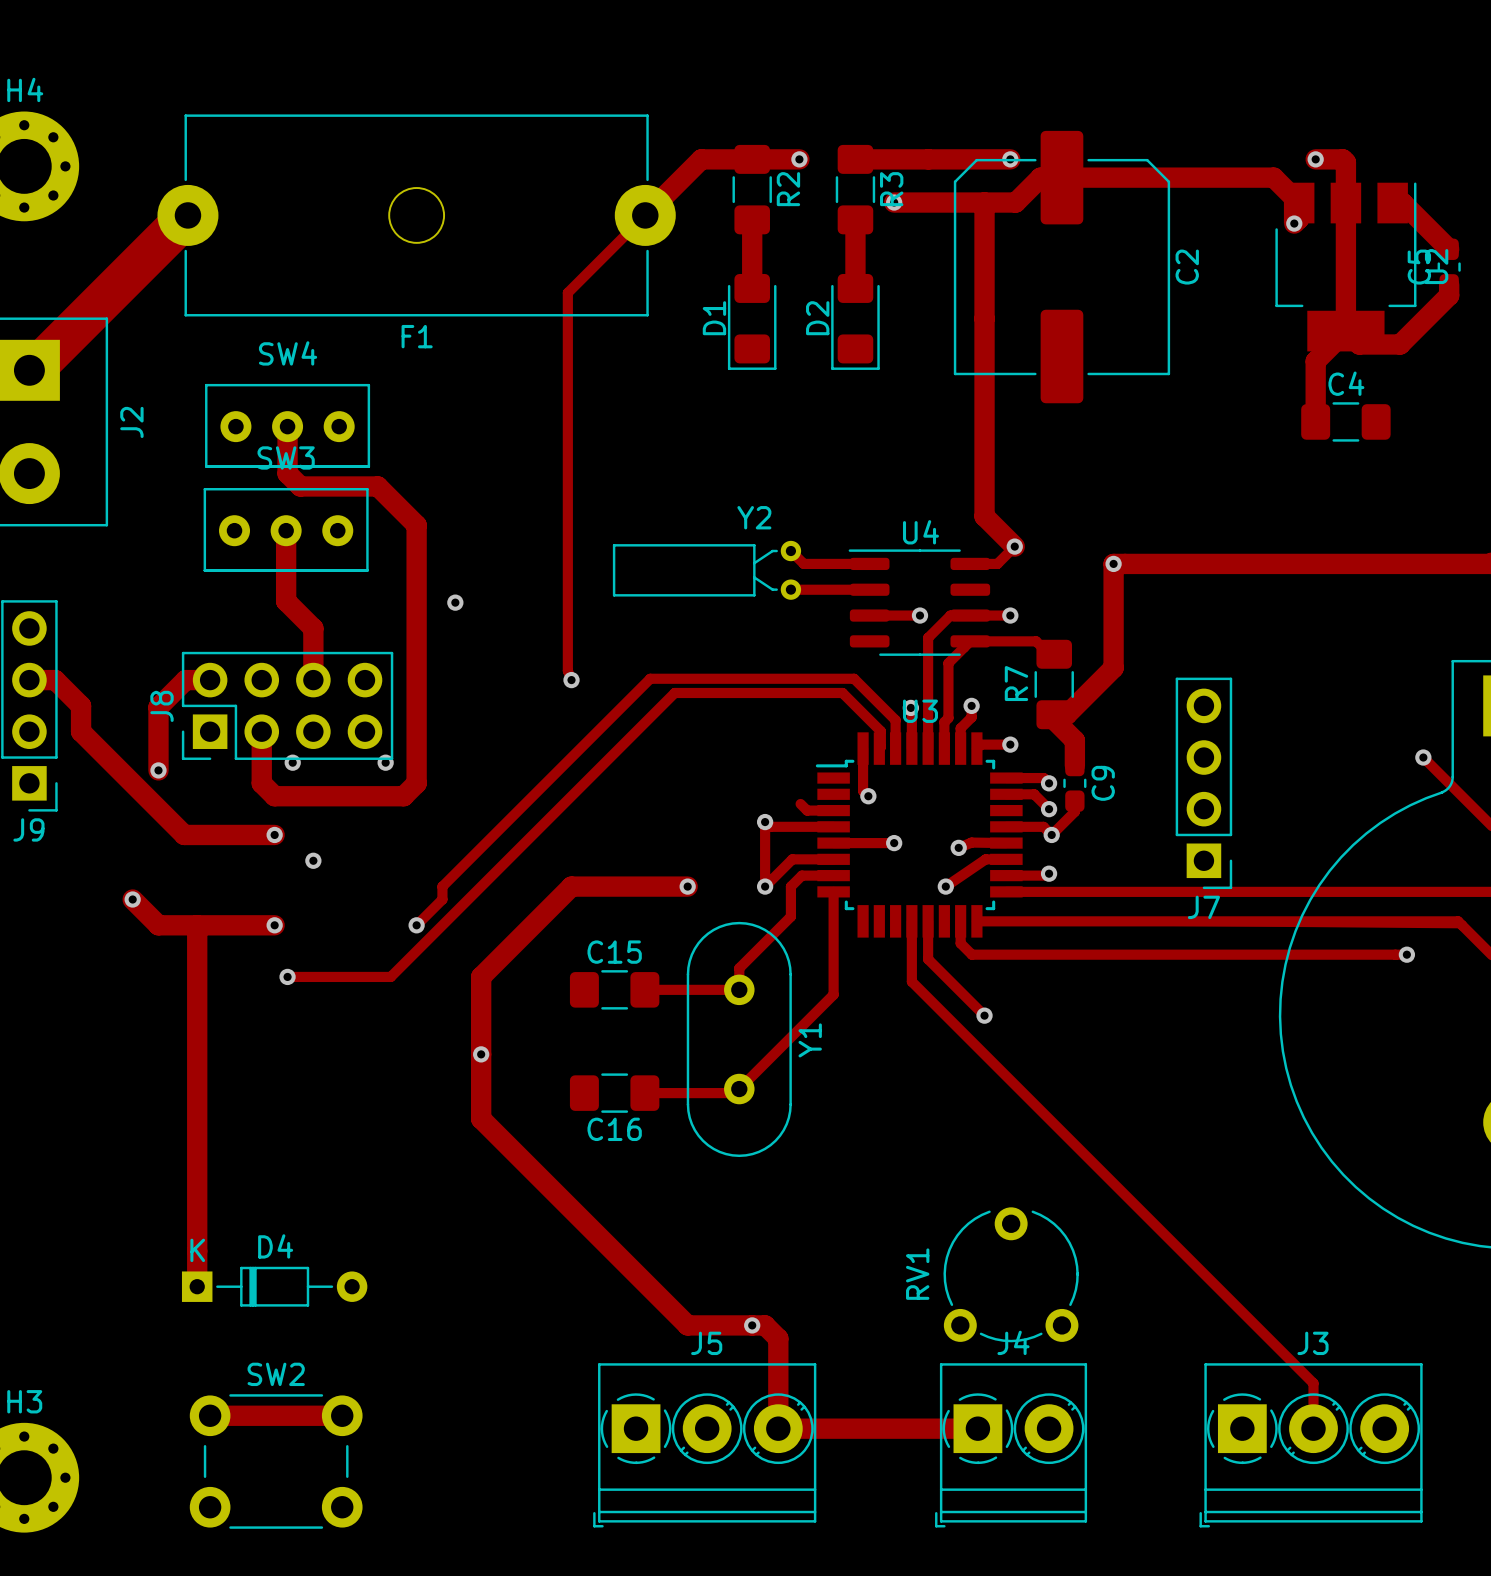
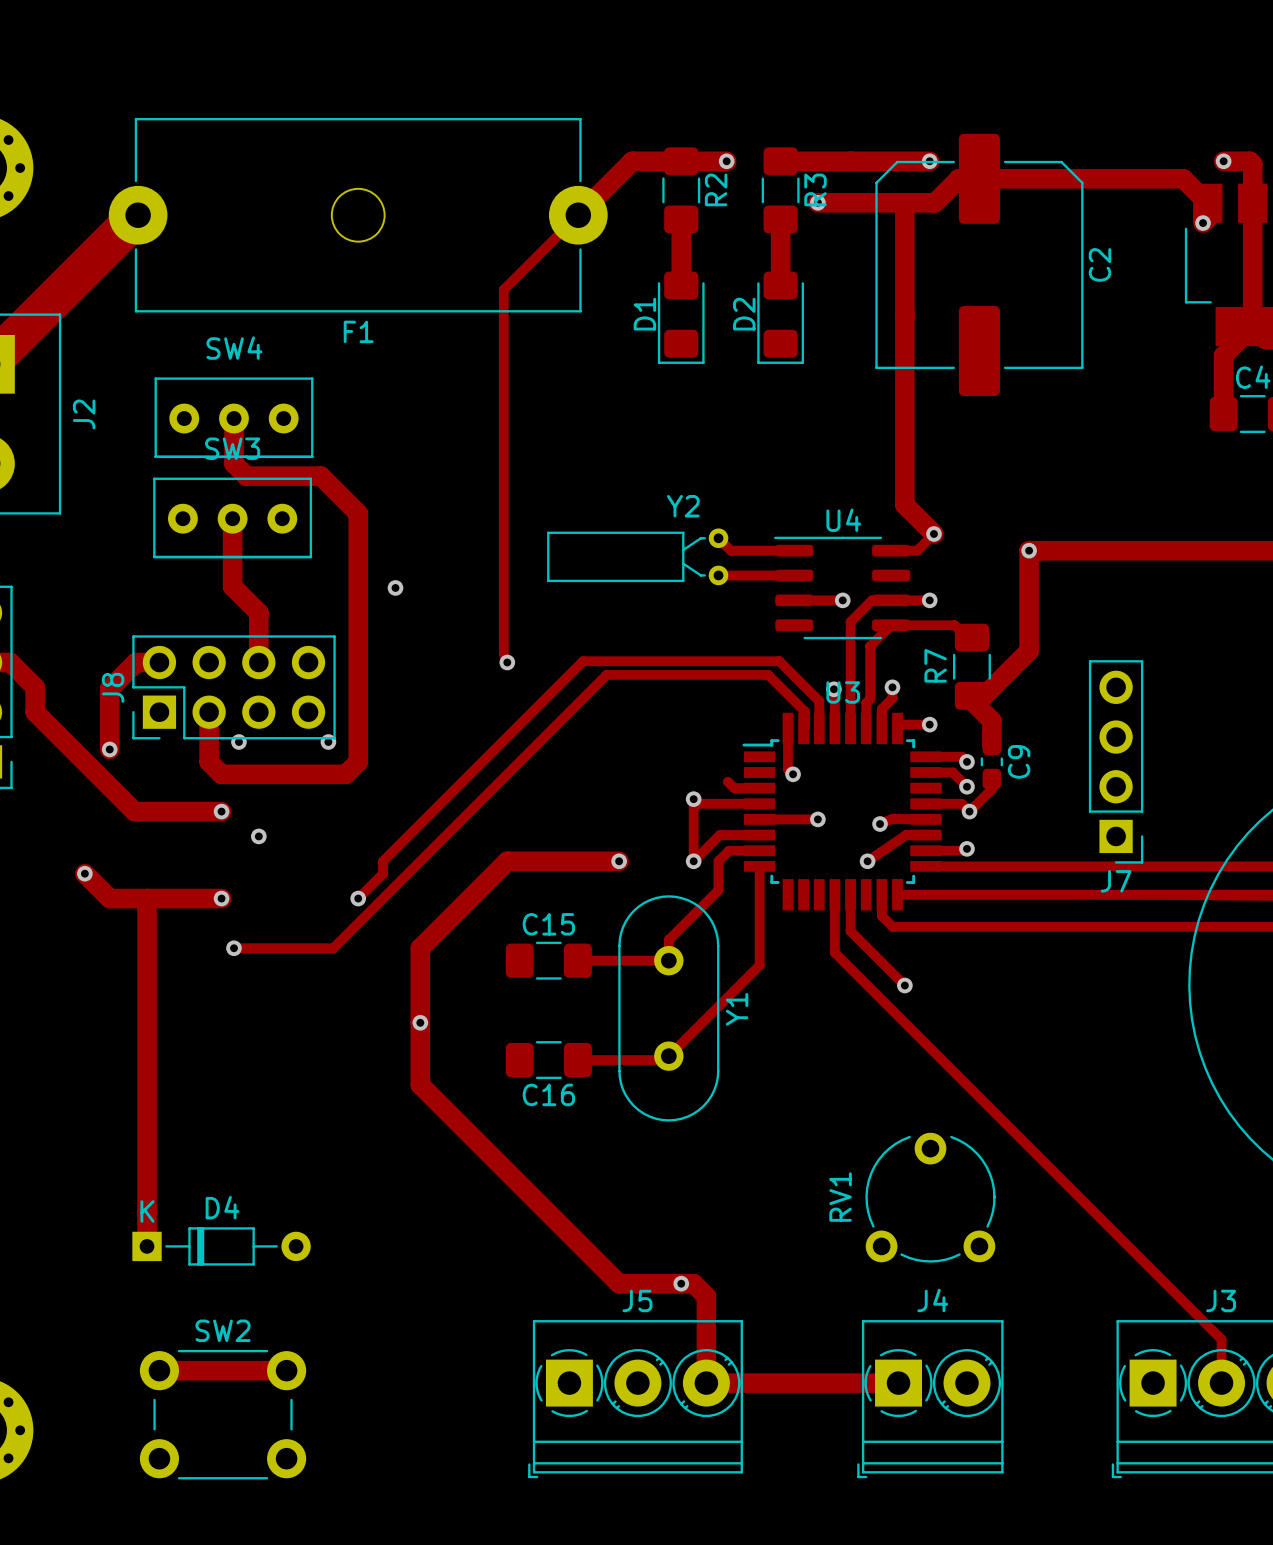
RV1 position: (1011, 1274) -> (930, 1197)

